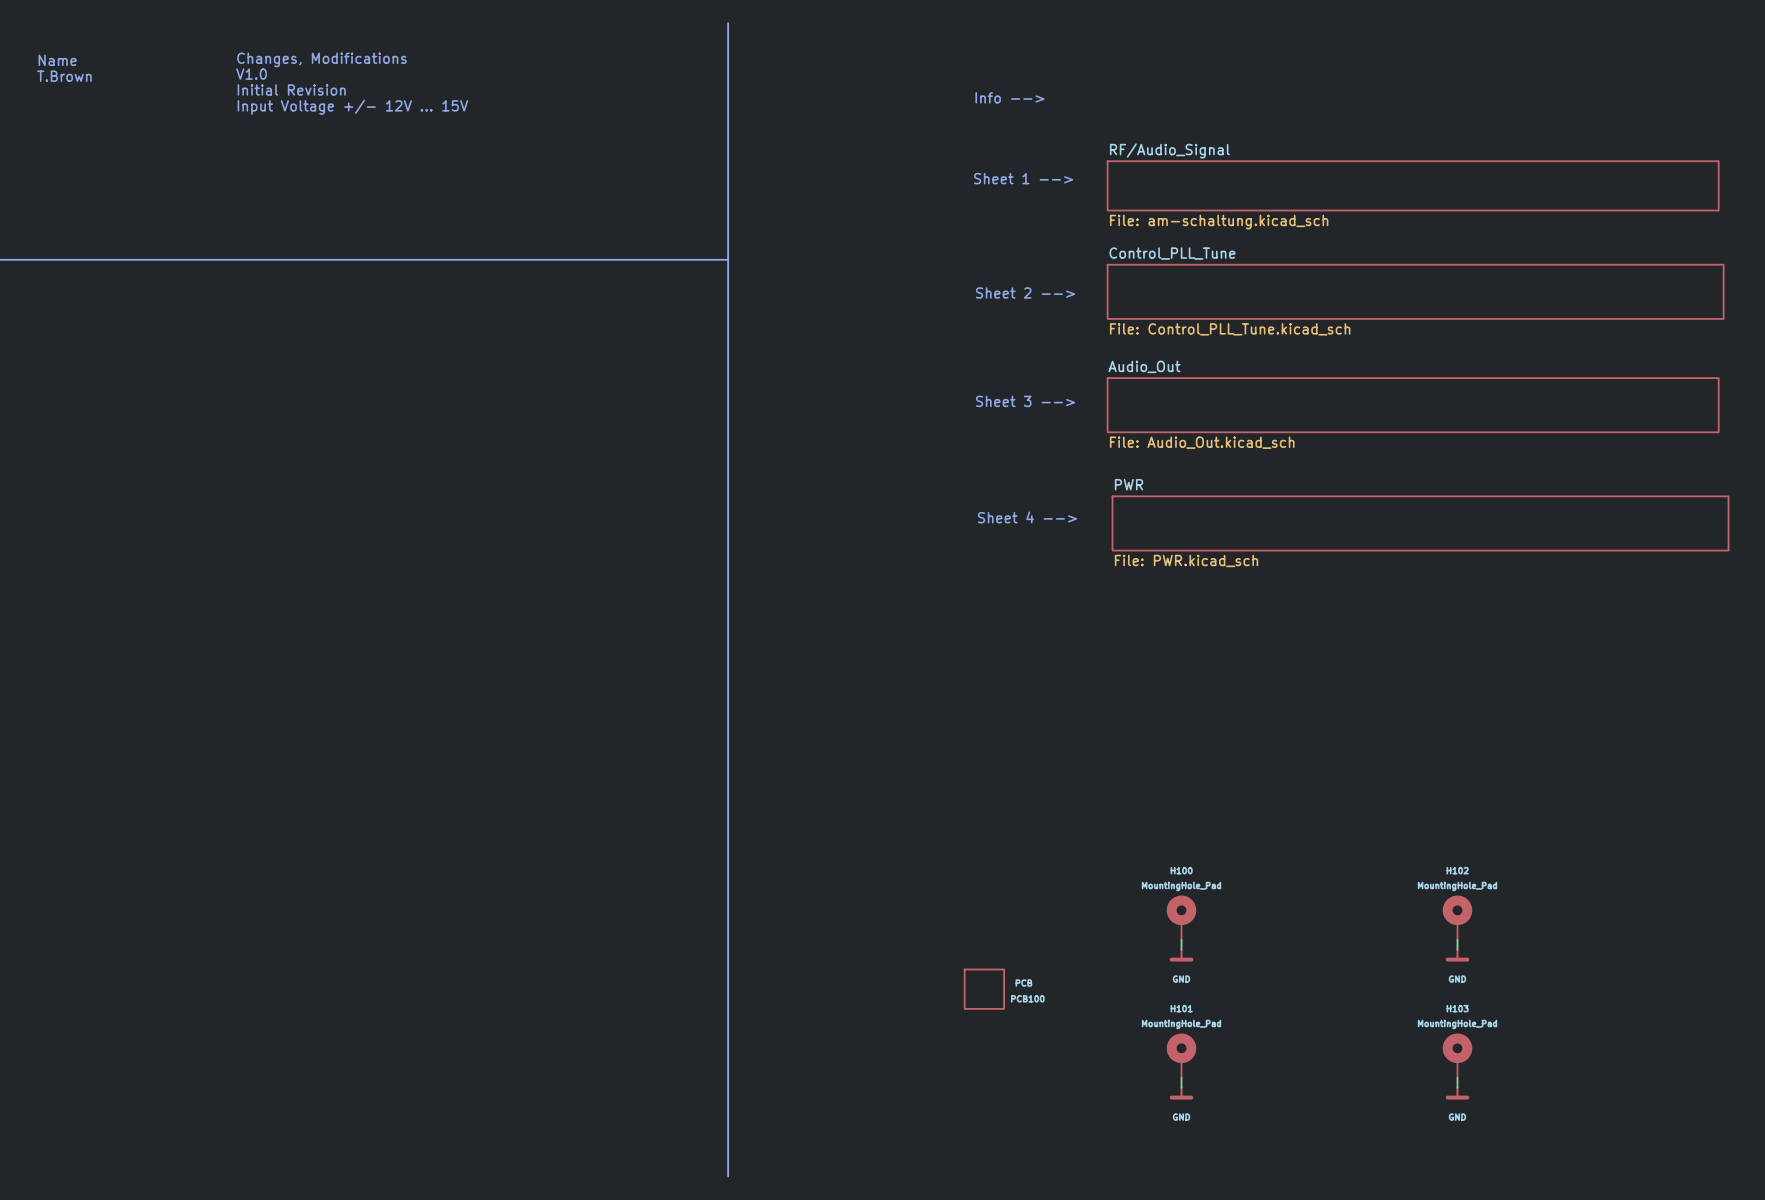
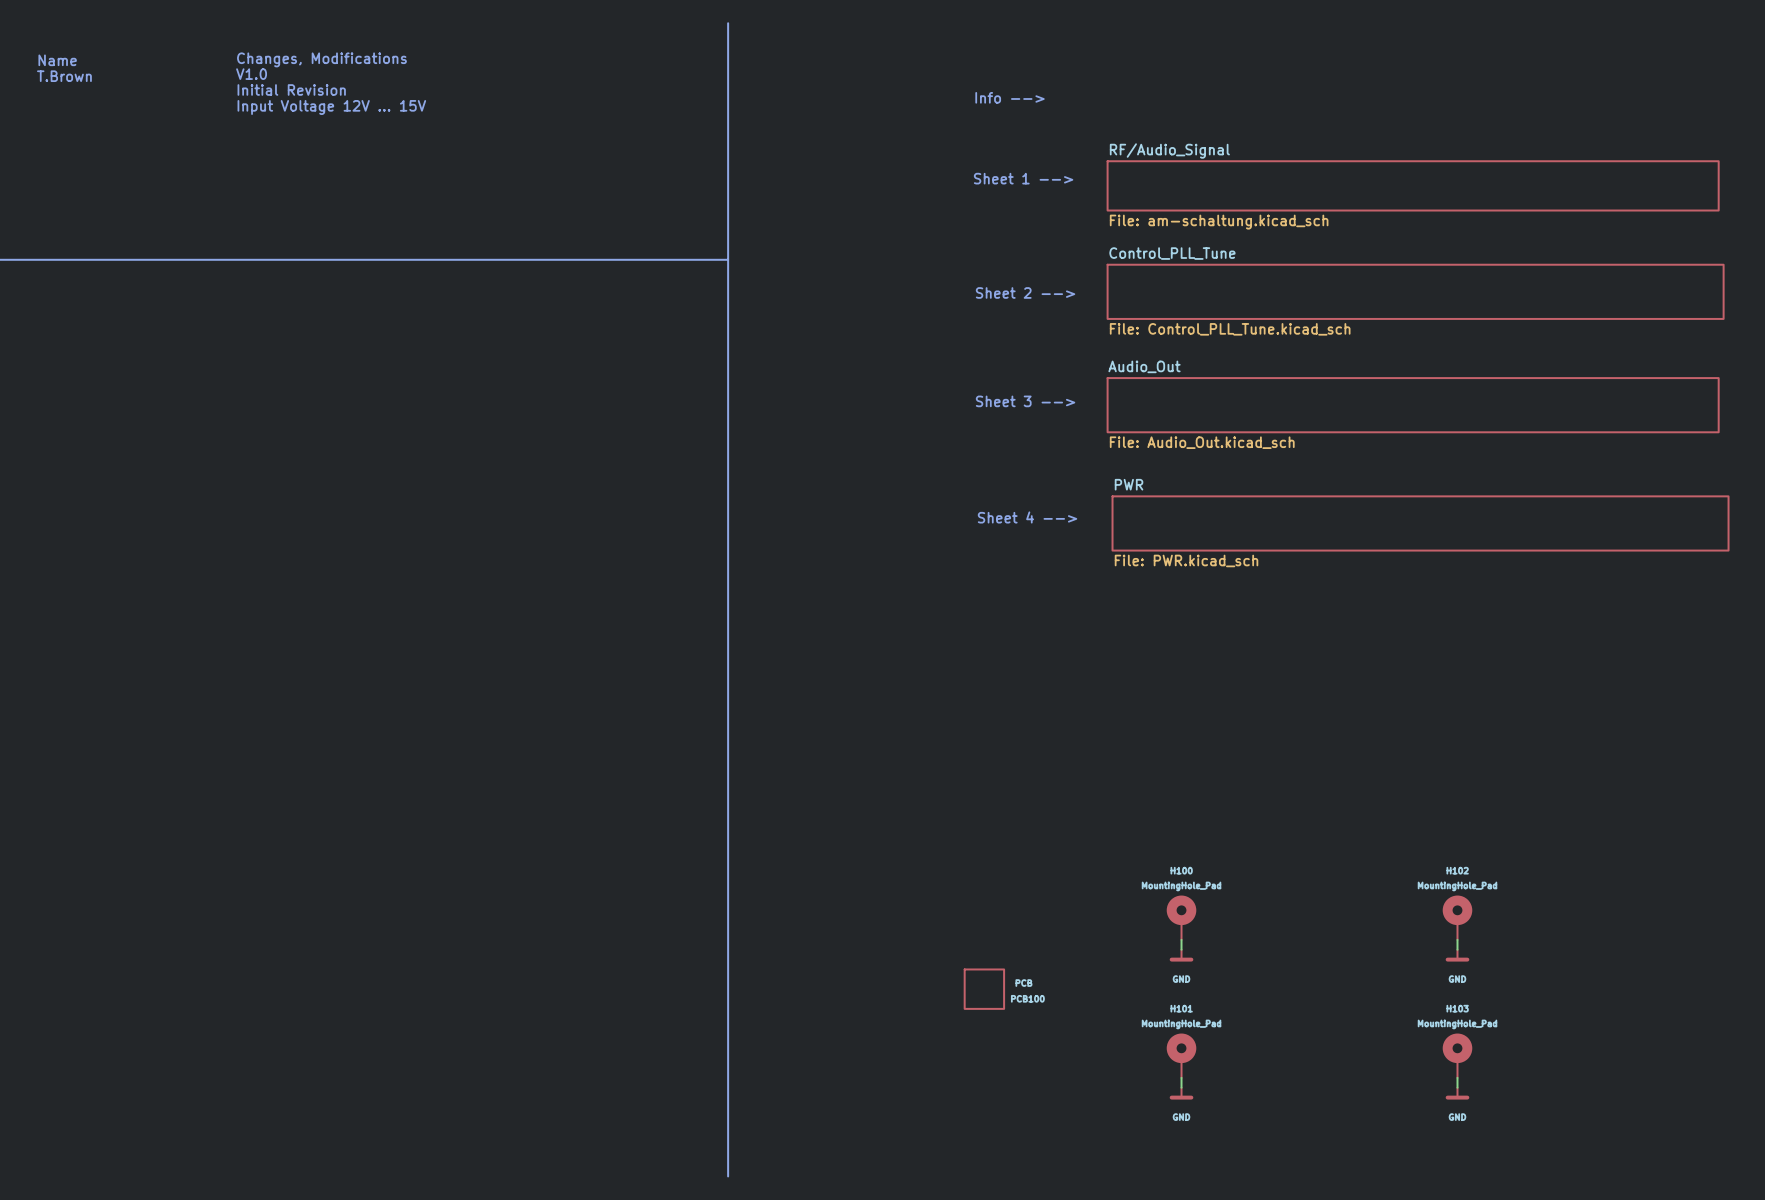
text: Input Voltage +/- 12V ... 15V (352, 107) -> Input Voltage 12V ... 15V (331, 107)

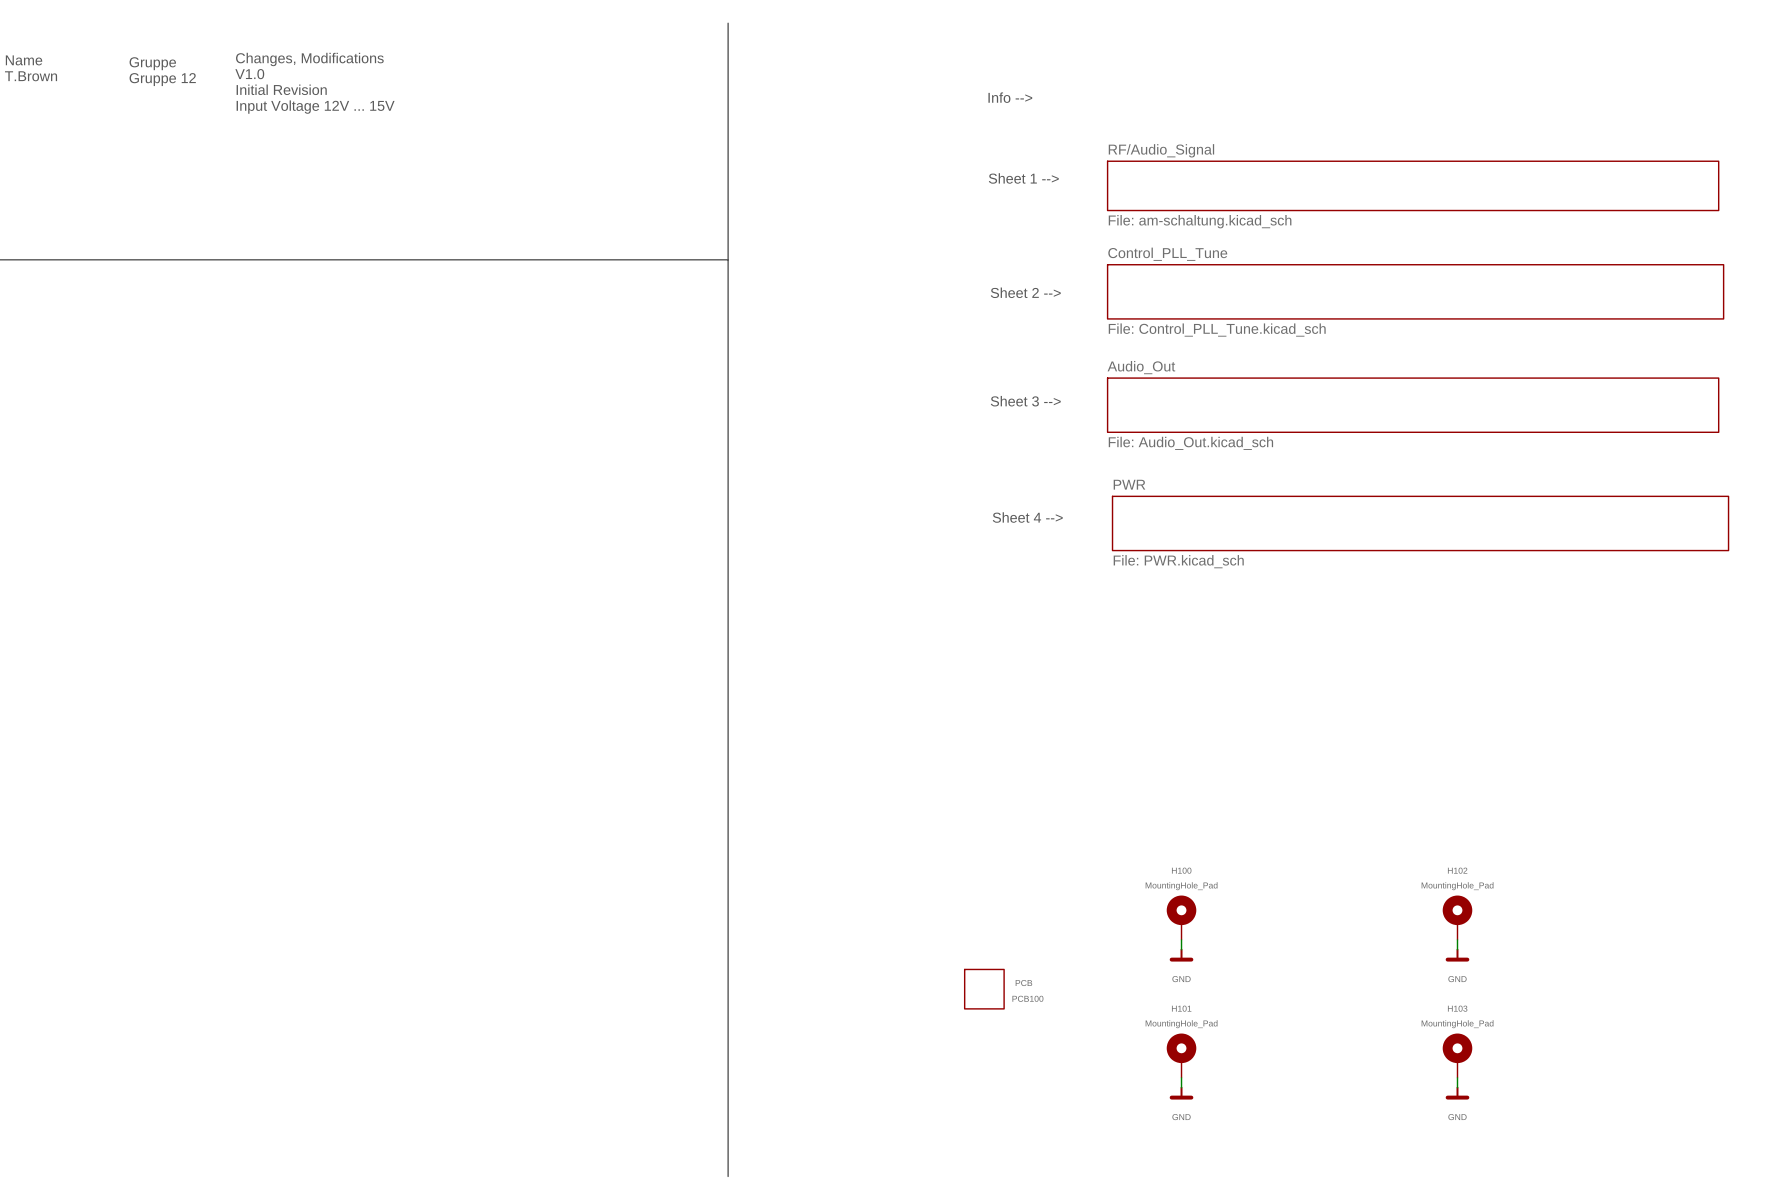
text position: Name (57, 60) -> Name (24, 60)
text: none -> Gruppe (152, 63)
text position: T.Brown (64, 76) -> T.Brown (31, 76)
text: none -> Gruppe 12 (162, 79)

